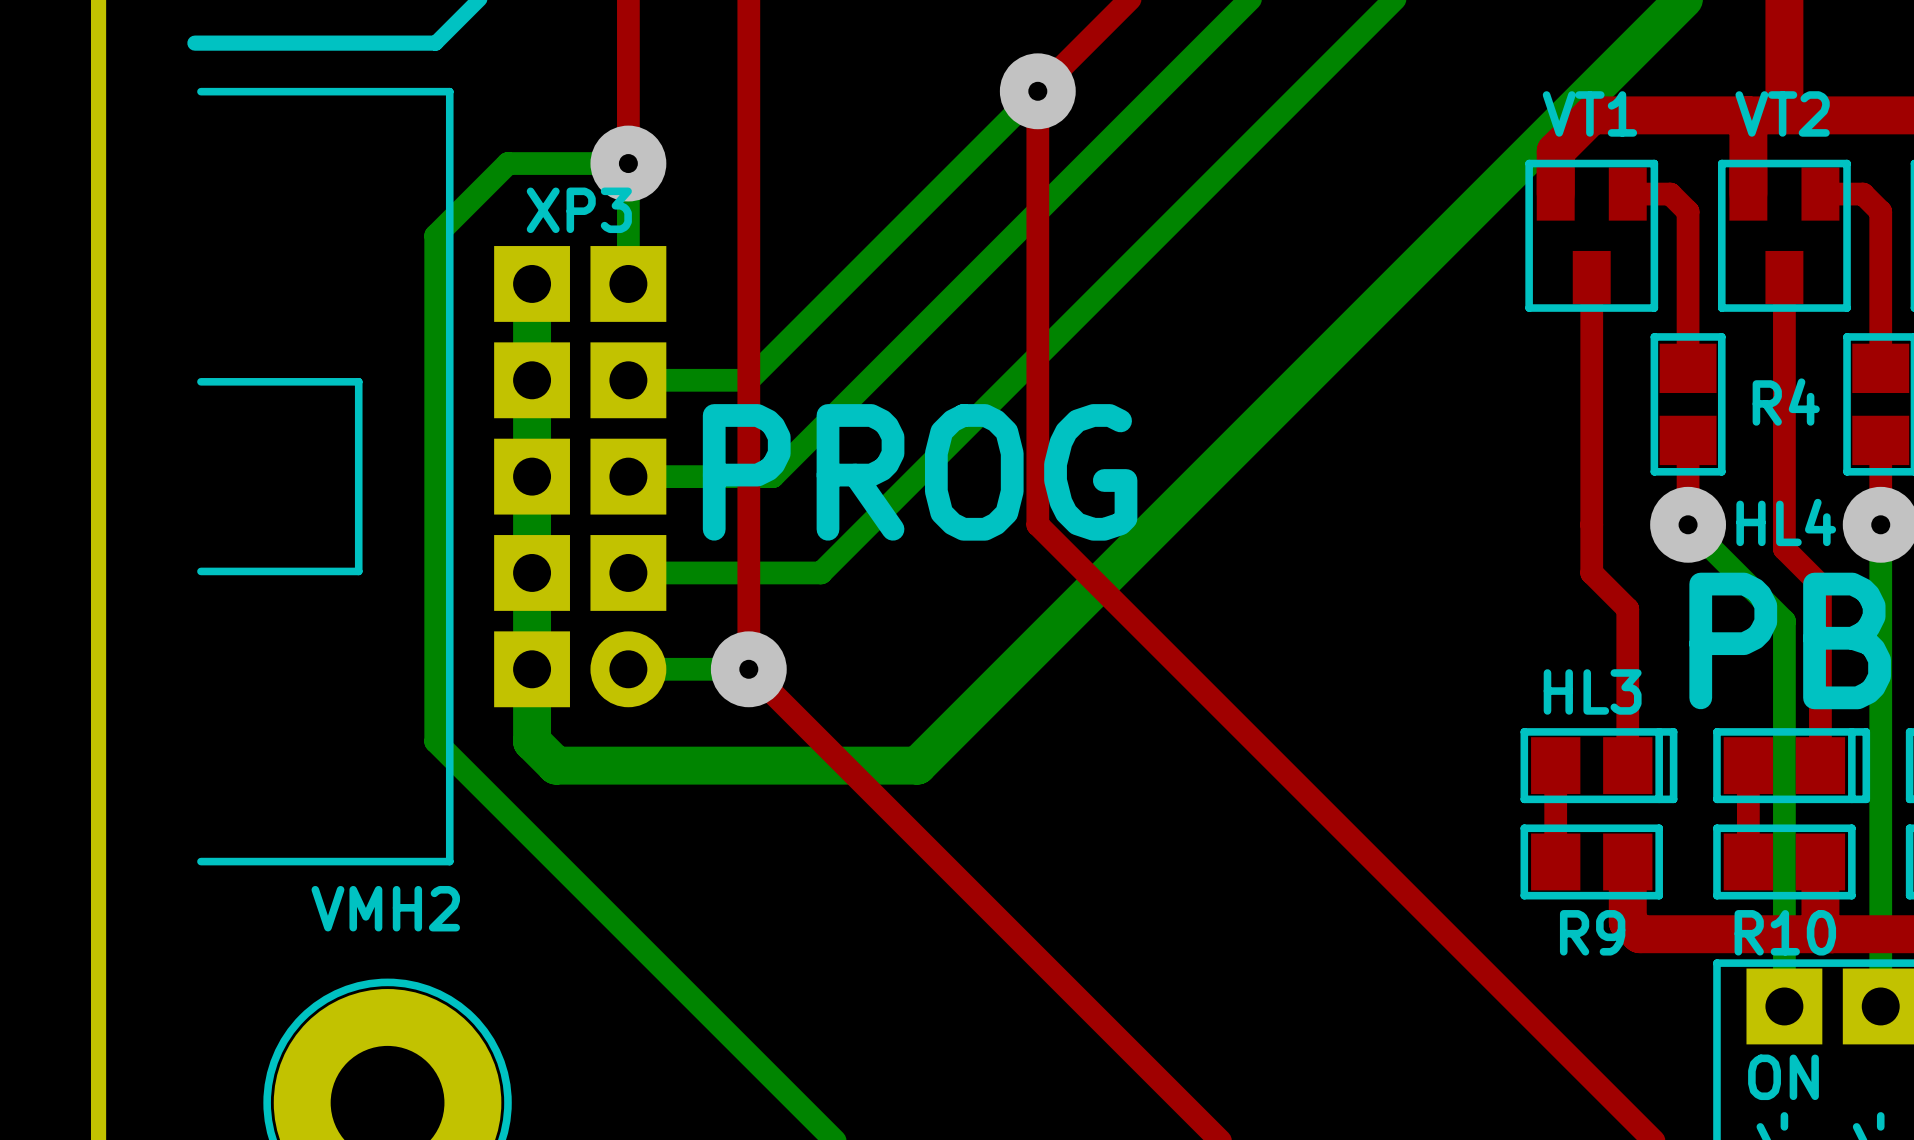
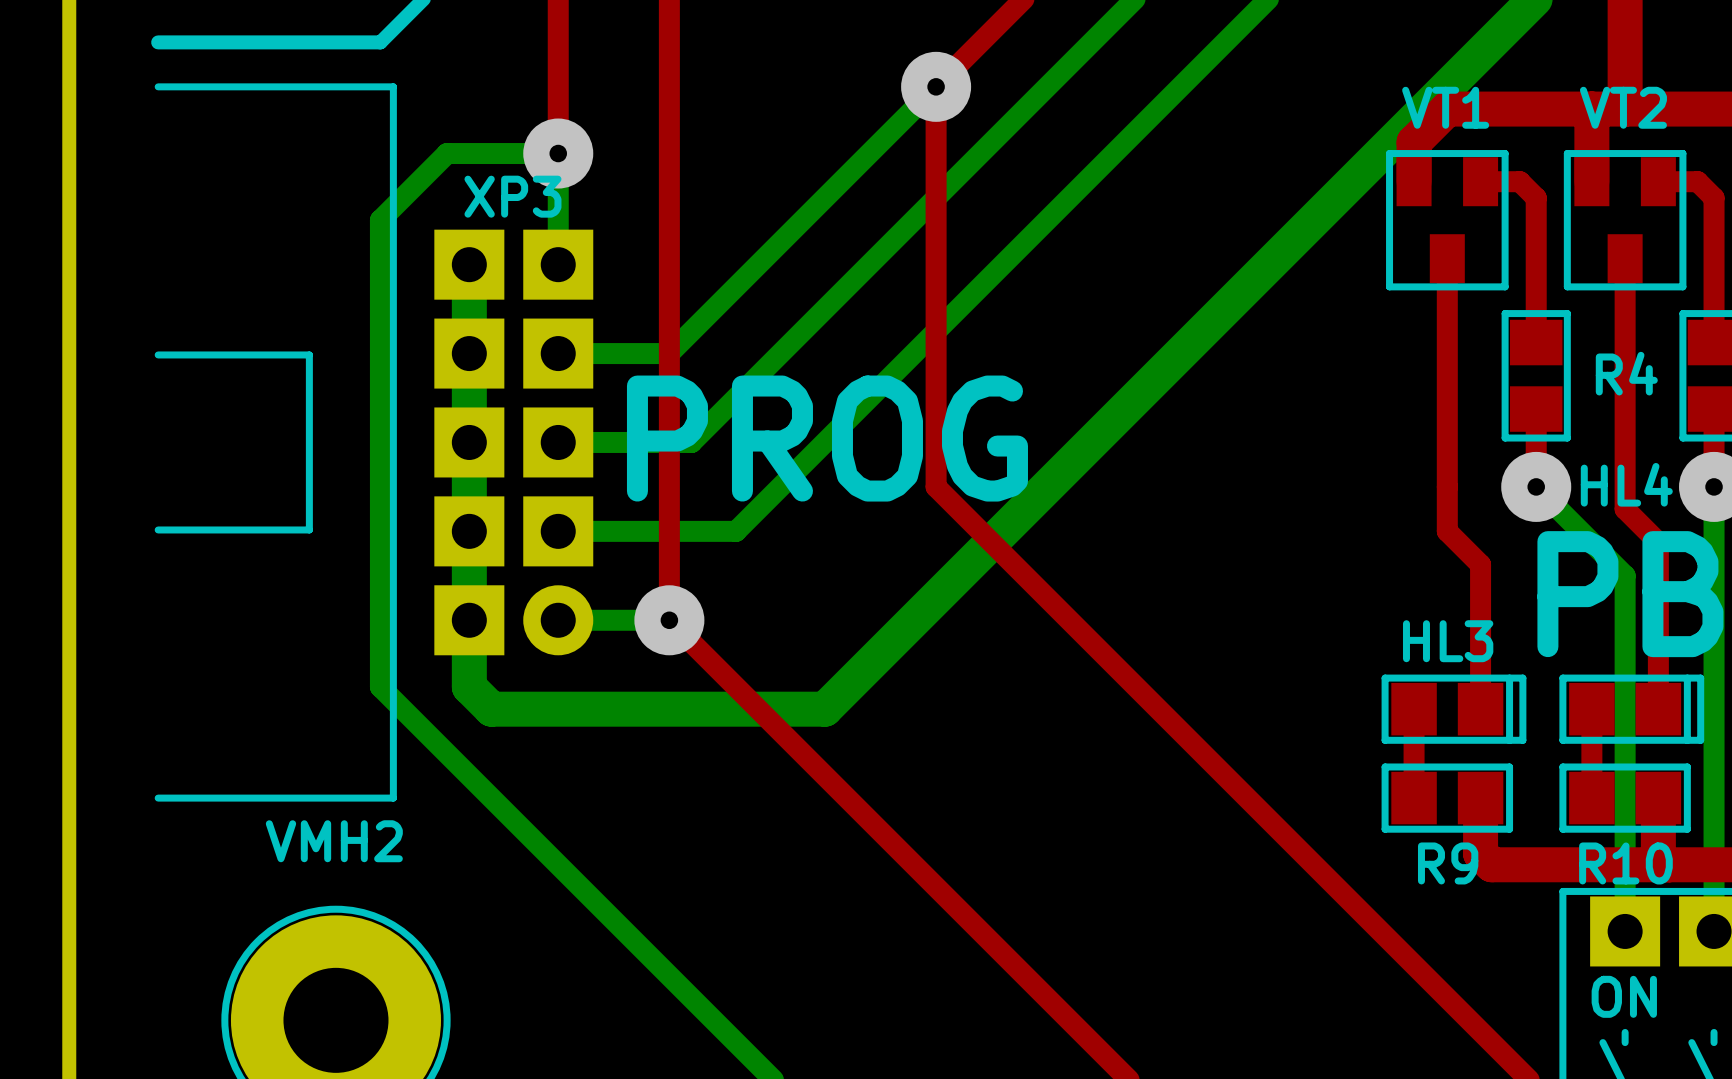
XP3 footprint: [197, 87, 667, 866] -> [154, 83, 594, 802]

